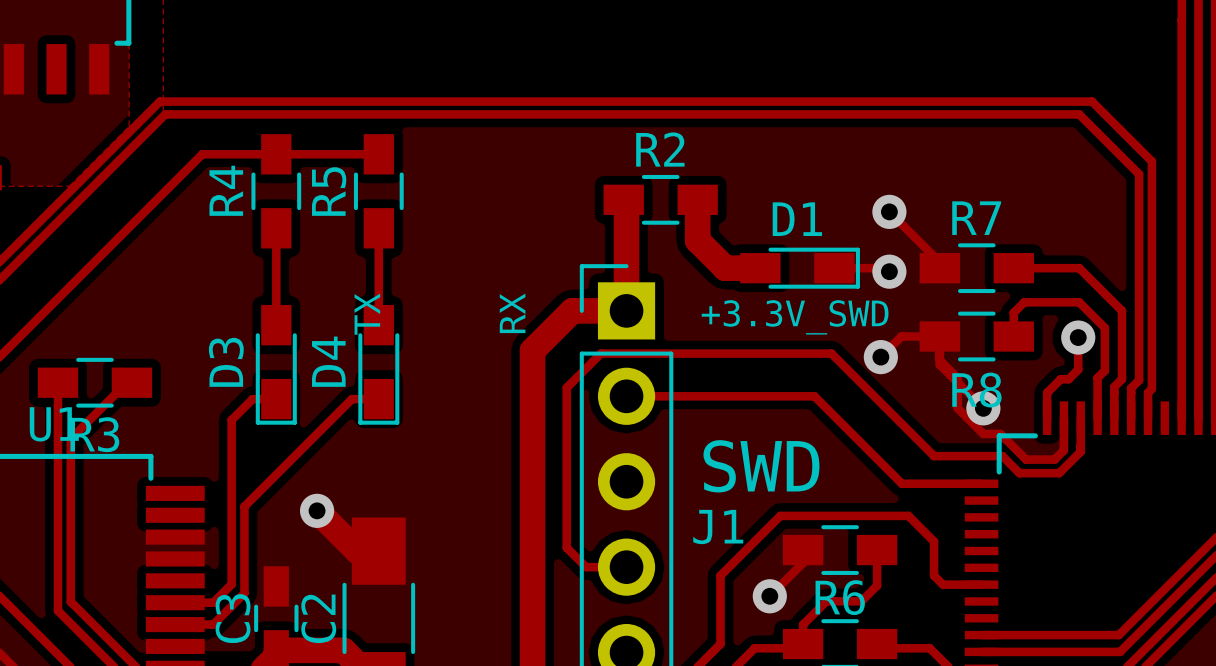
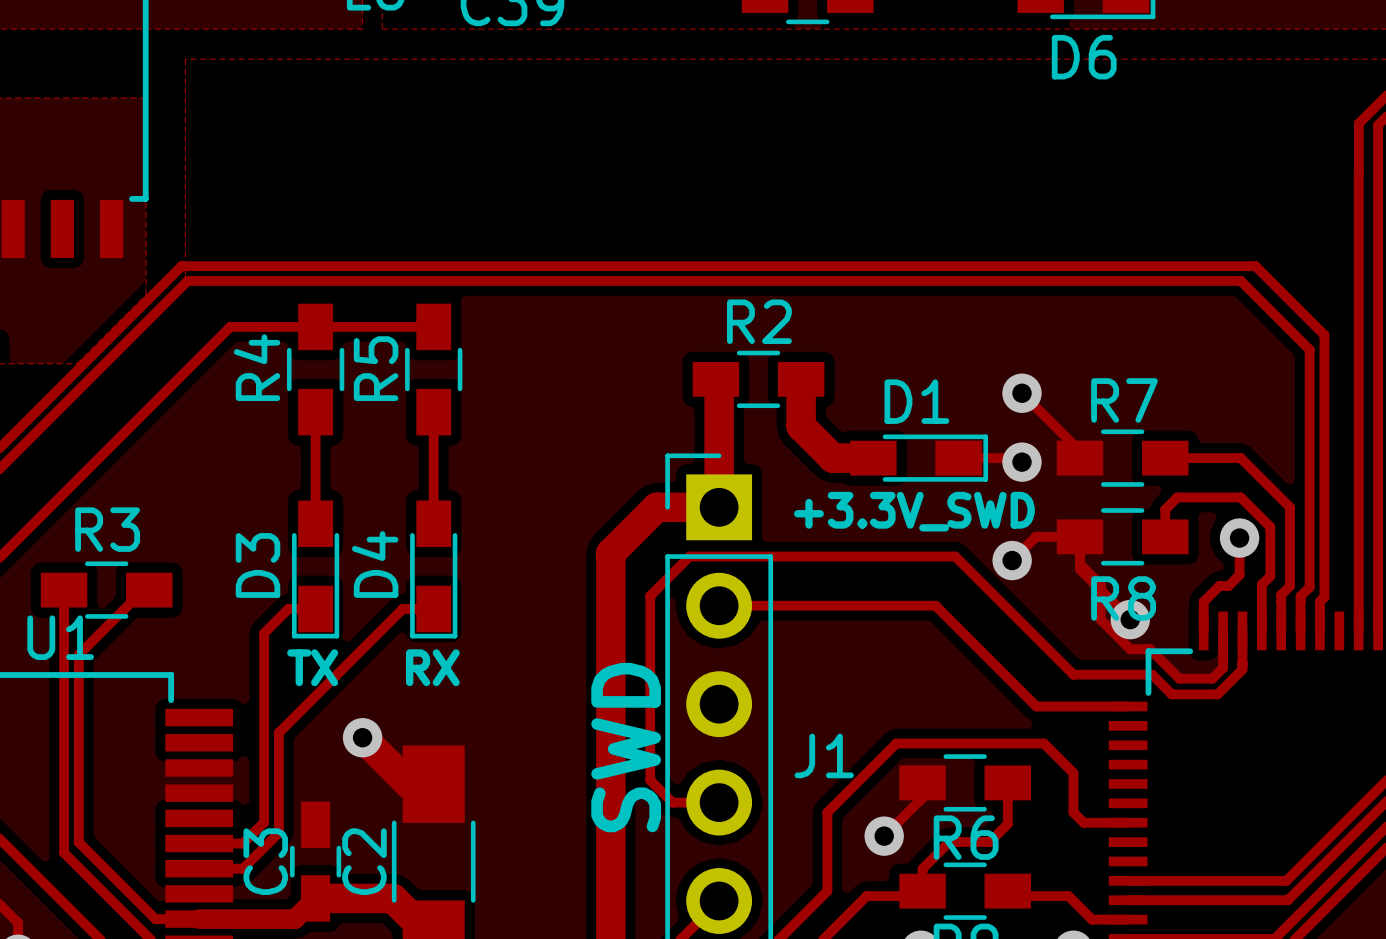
text rotation: 0° (512, 313) -> 90° clockwise (432, 667)
text position: RX (512, 313) -> RX (432, 667)
text rotation: 0° (367, 314) -> 90° clockwise (312, 667)
text position: TX (367, 314) -> TX (312, 667)
R3 name position: R3 (94, 434) -> R3 (107, 529)
text rotation: 0° (761, 466) -> 90° counterclockwise (626, 747)
text position: SWD (761, 466) -> SWD (626, 747)

